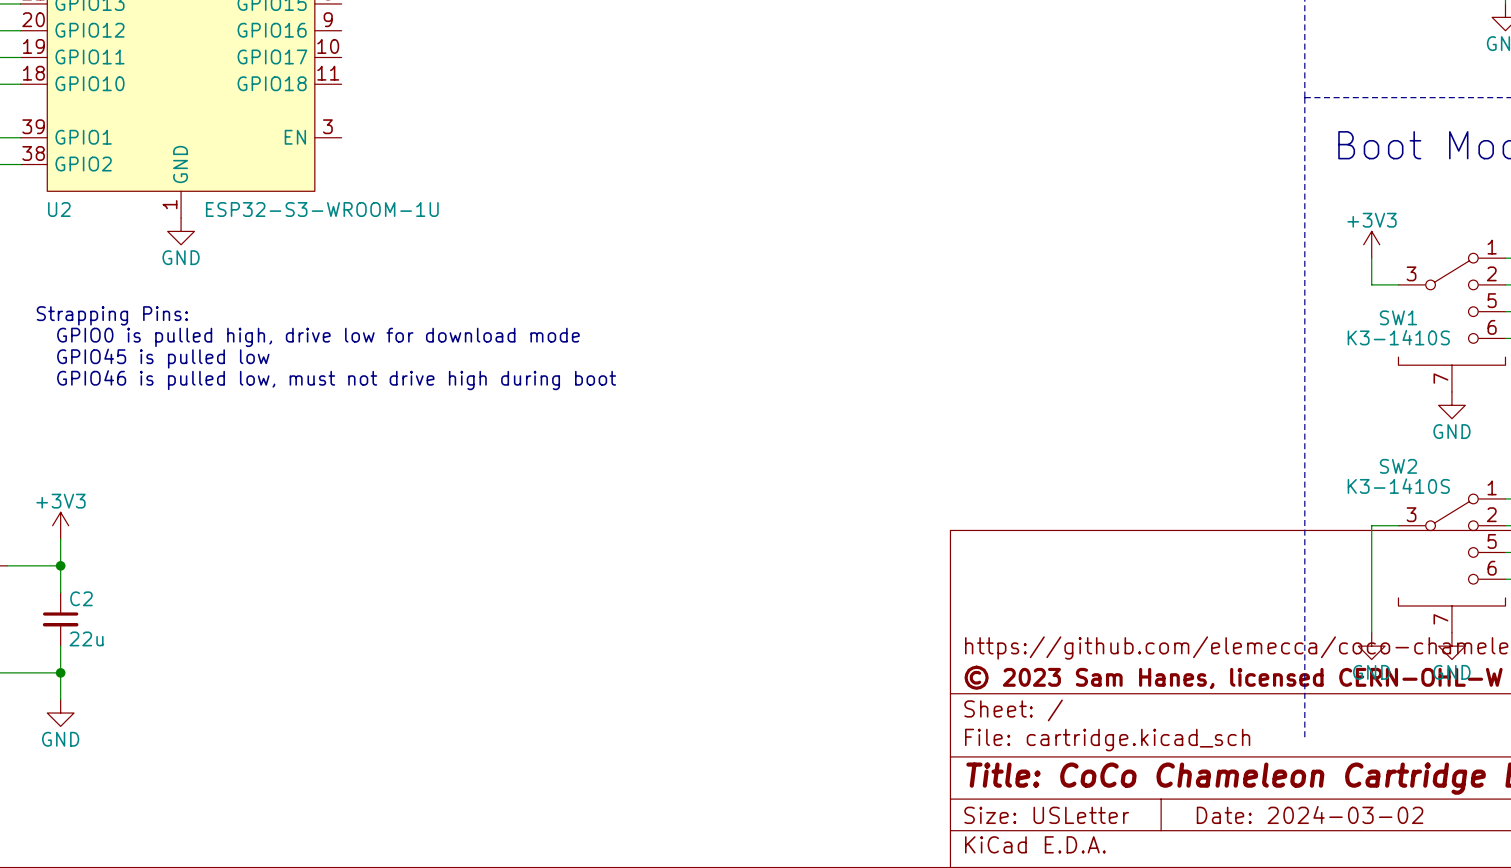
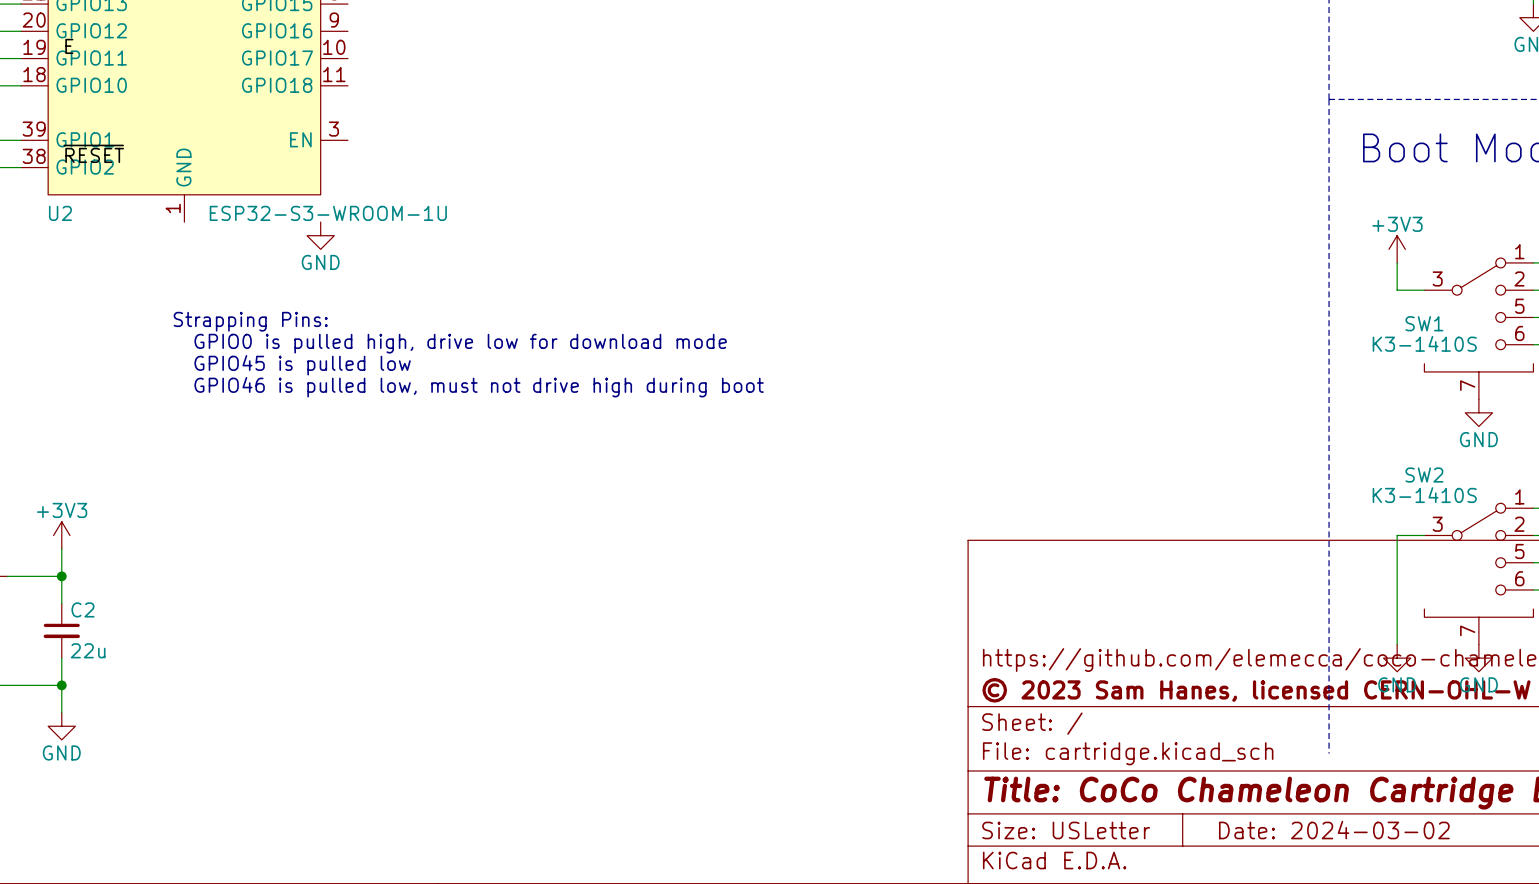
label: none -> E (69, 46)
label: none -> ~{RESET} (93, 153)
power symbol position: GND (181, 231) -> GND (320, 235)
text position: Strapping Pins: (112, 315) -> Strapping Pins: (250, 321)
text position: GPIO0 is pulled high, drive low for download mode (318, 337) -> GPIO0 is pulled high, drive low for download mode (460, 343)
text position: GPIO45 is pulled low (163, 358) -> GPIO45 is pulled low (302, 365)
text position: GPIO46 is pulled low, must not drive high during boot (336, 380) -> GPIO46 is pulled low, must not drive high during boot (479, 387)

